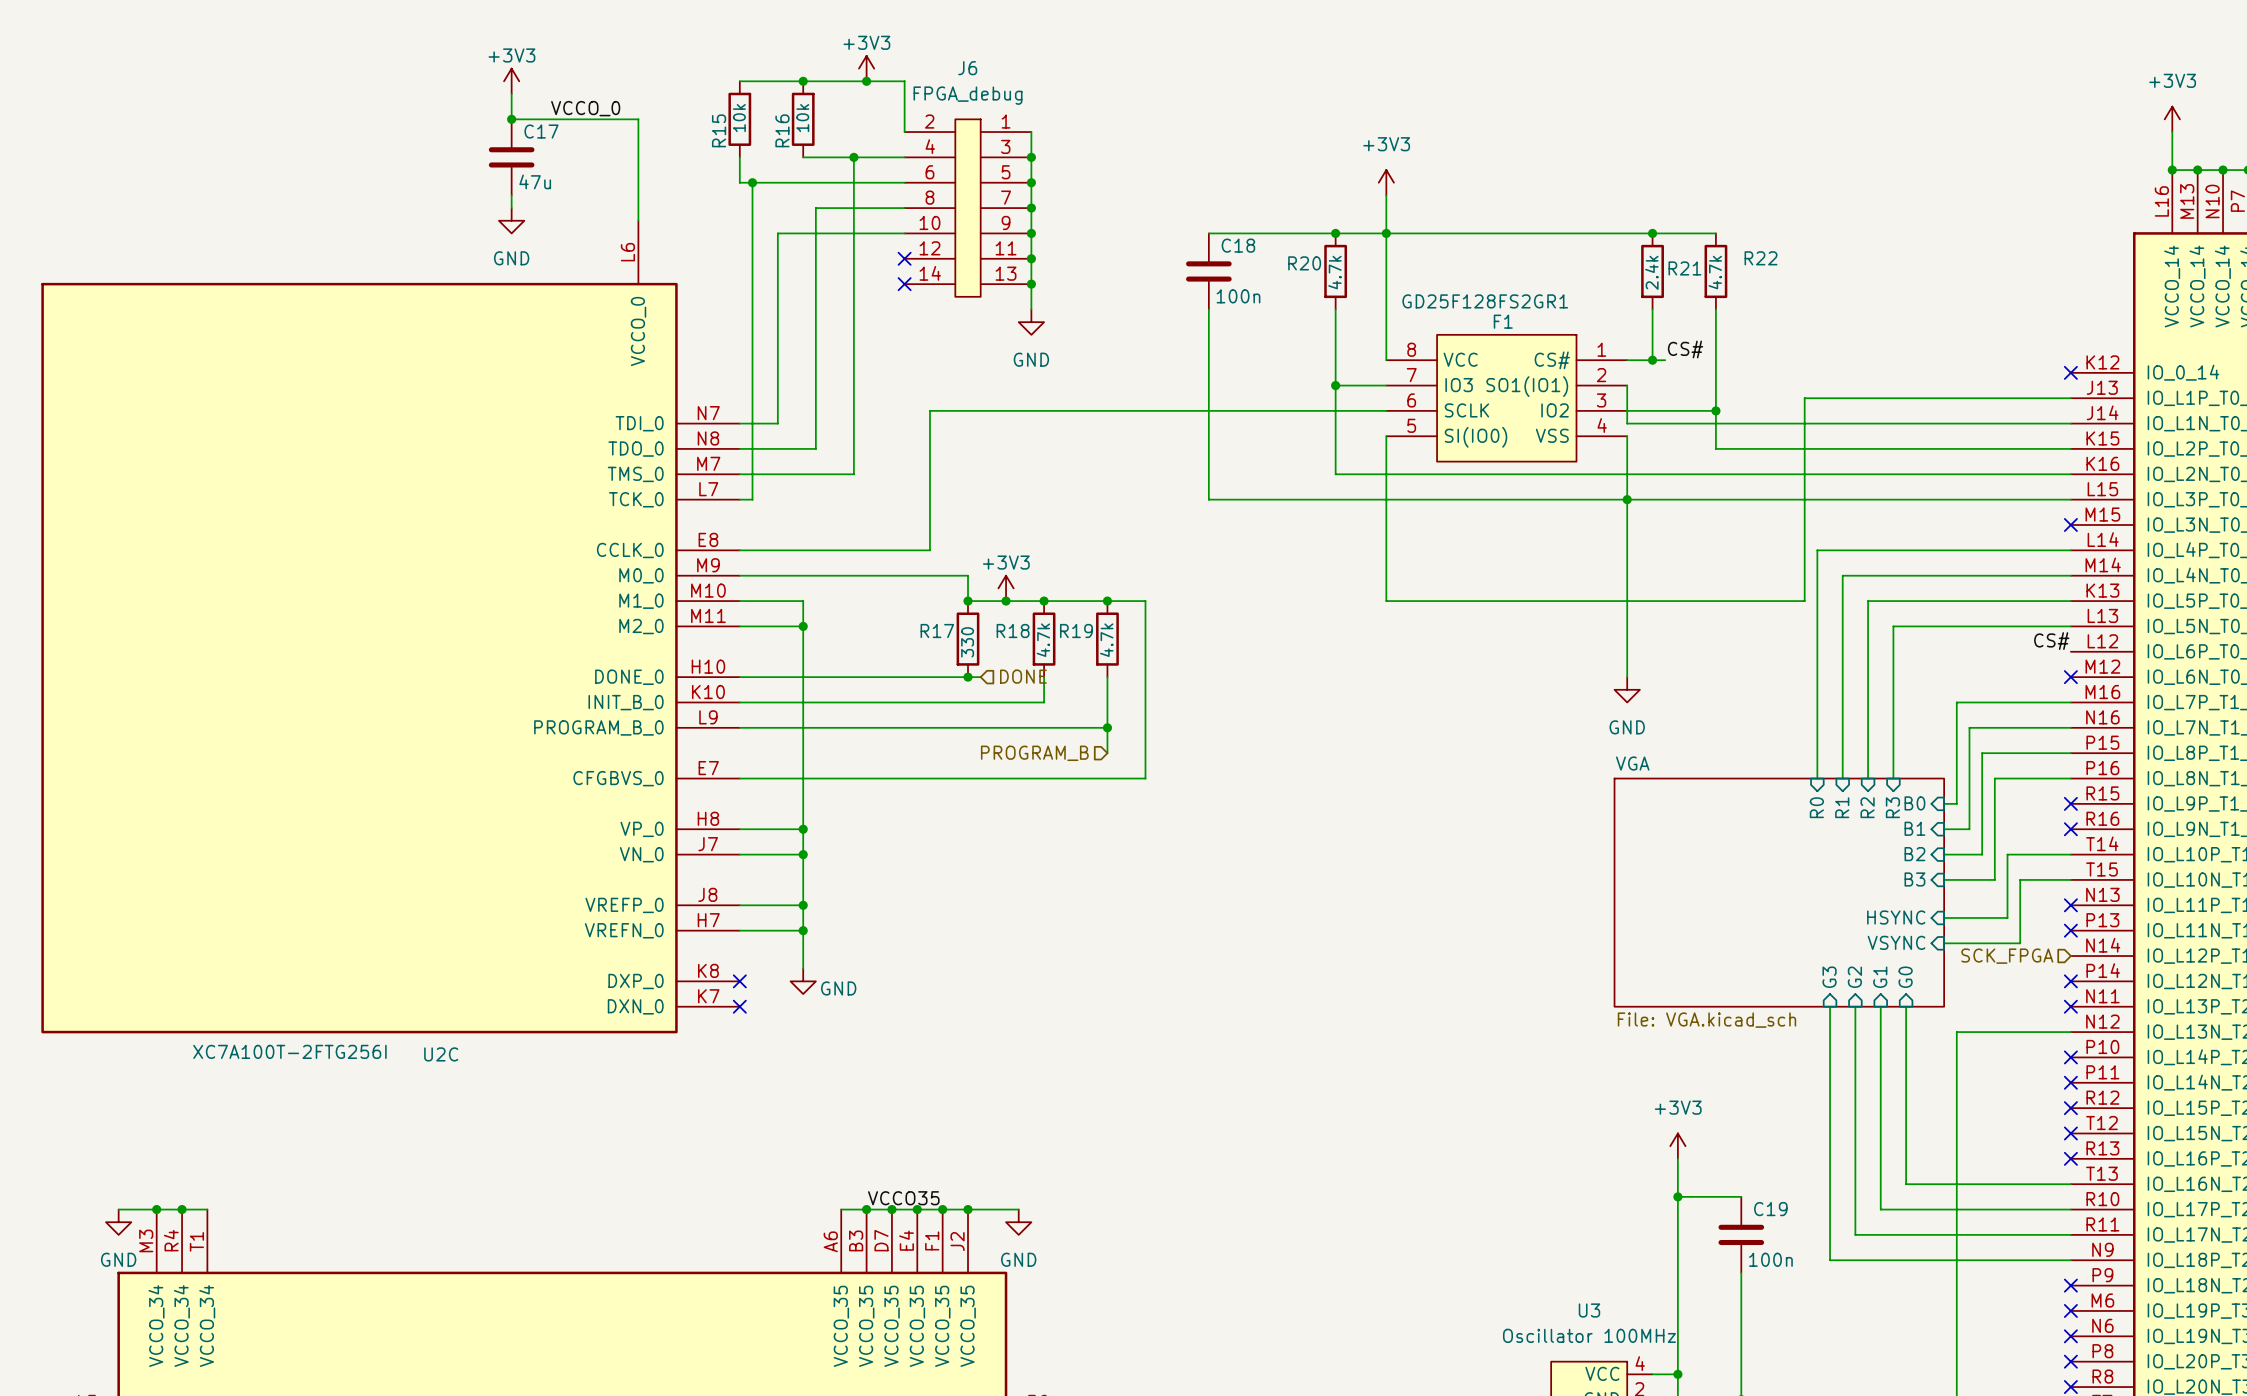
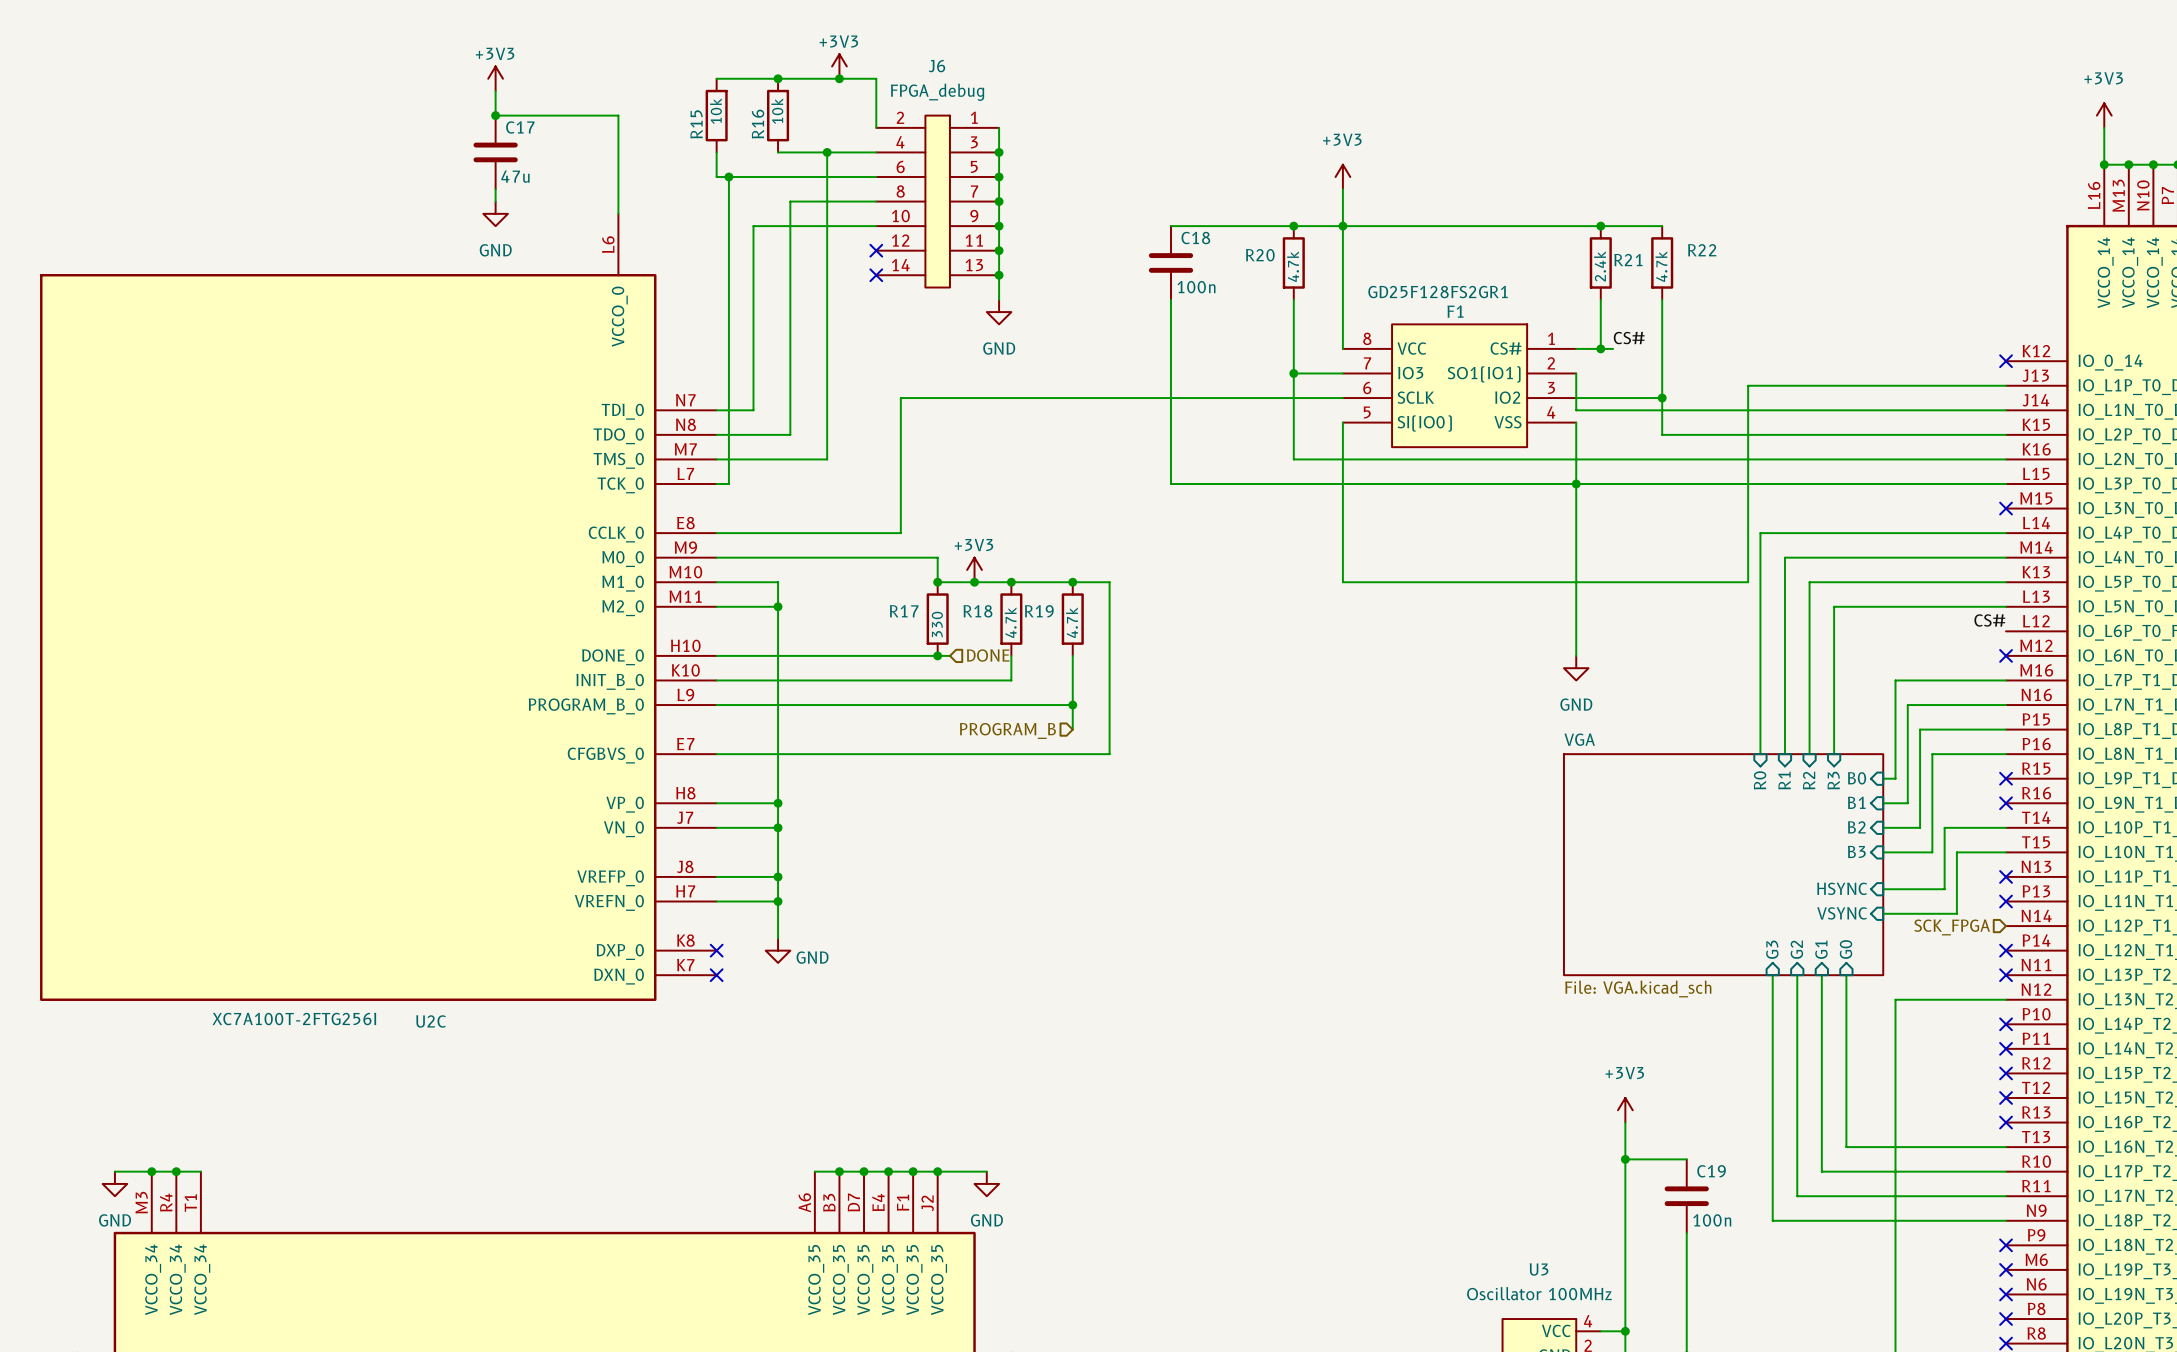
label: VCCO_0 (585, 108) -> none
label: VCCO35 (903, 1198) -> none

